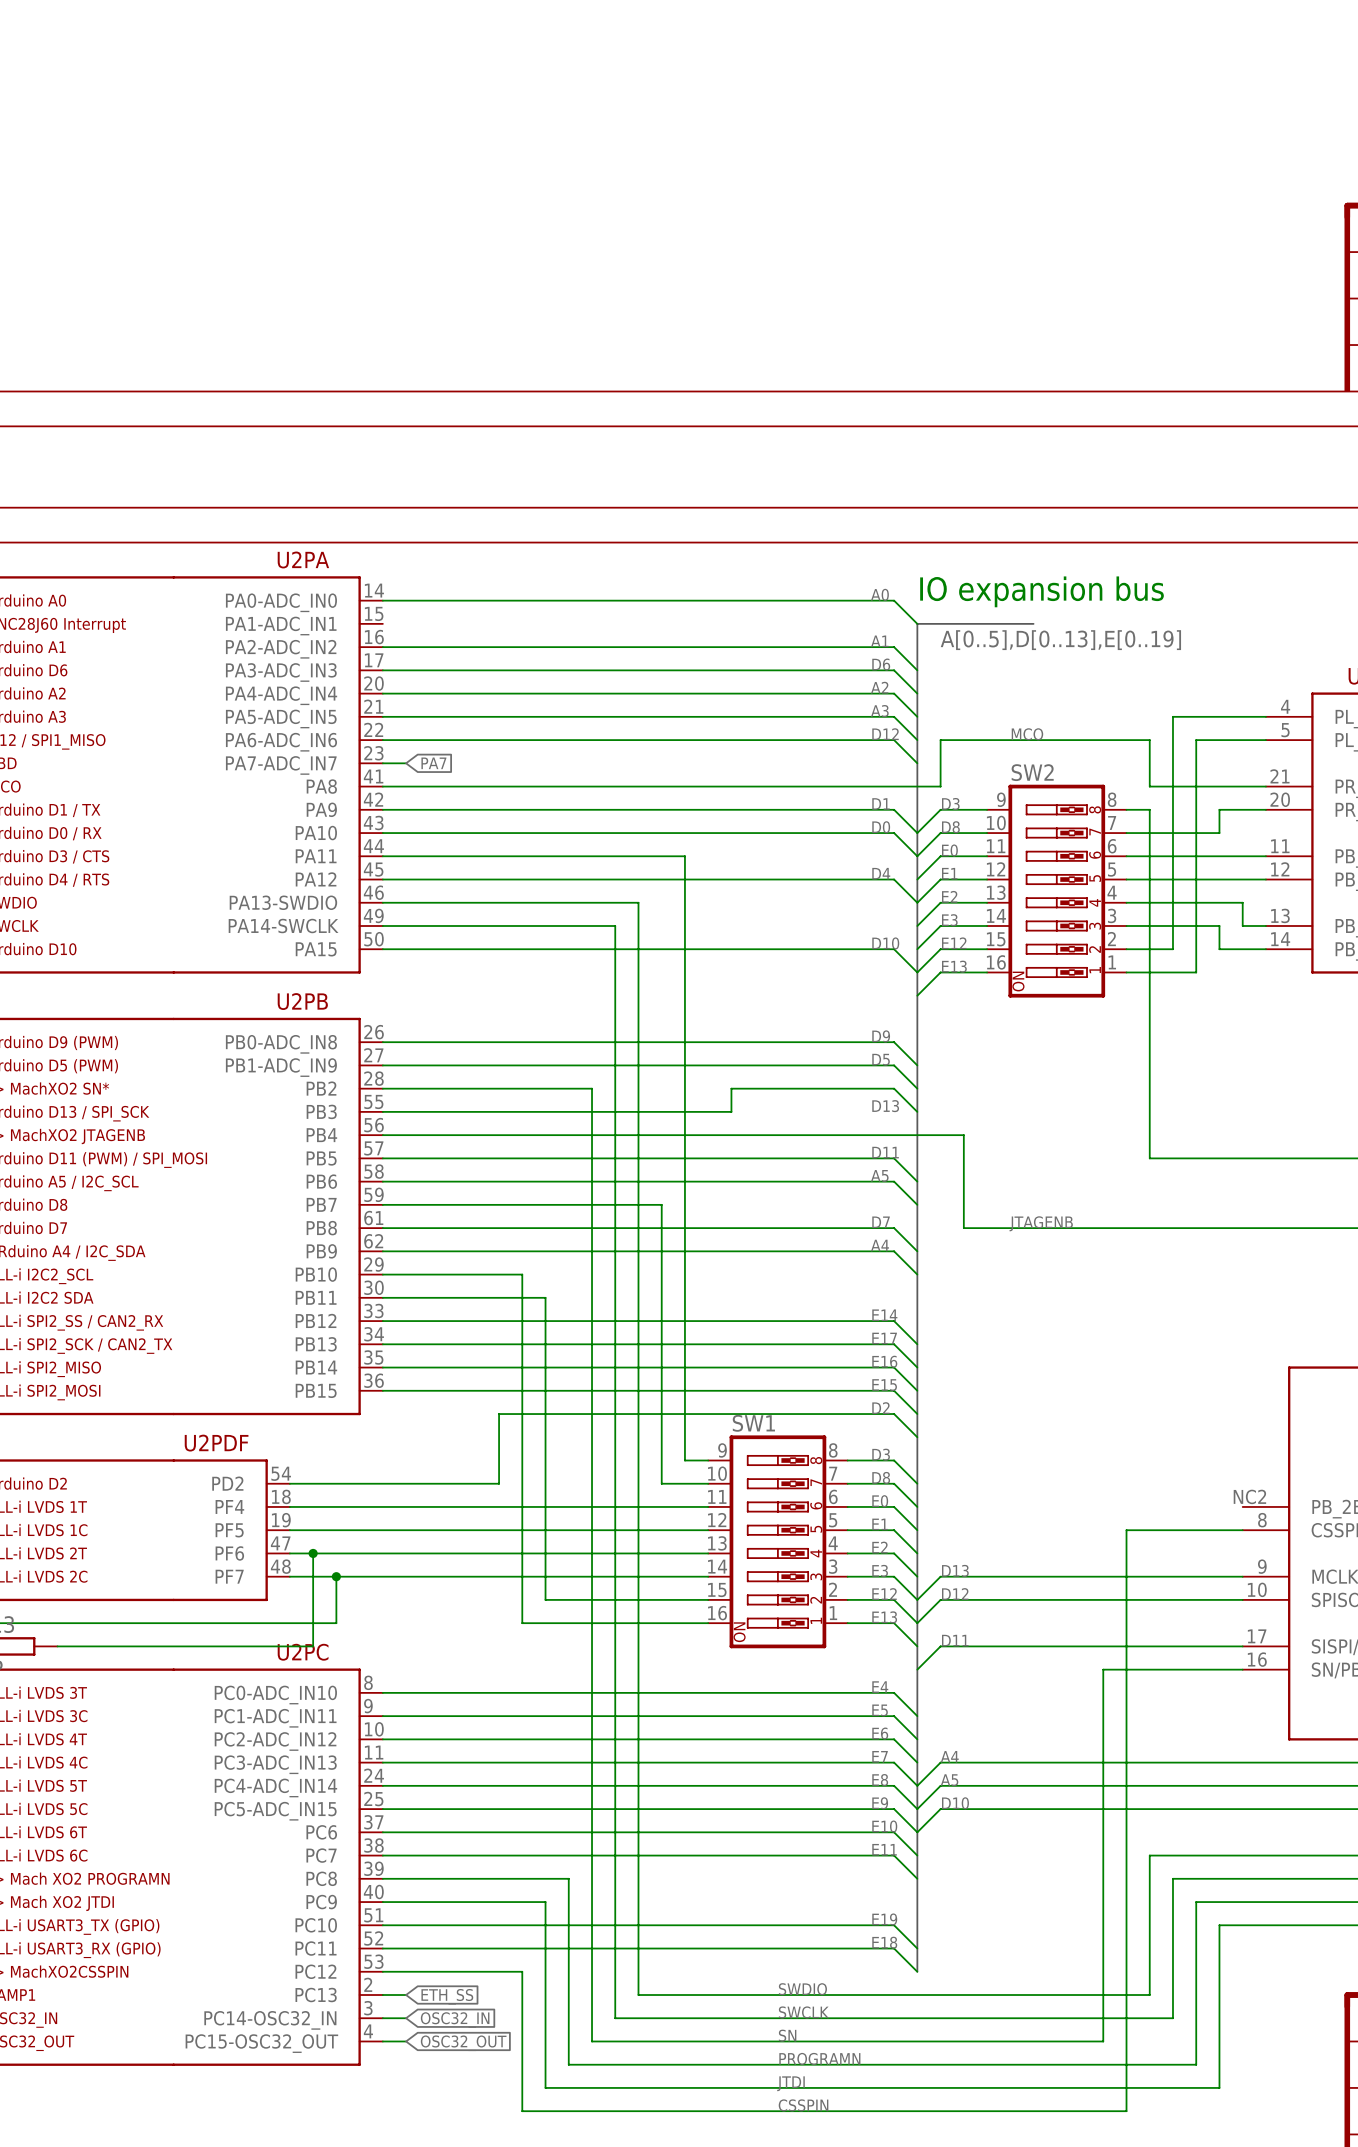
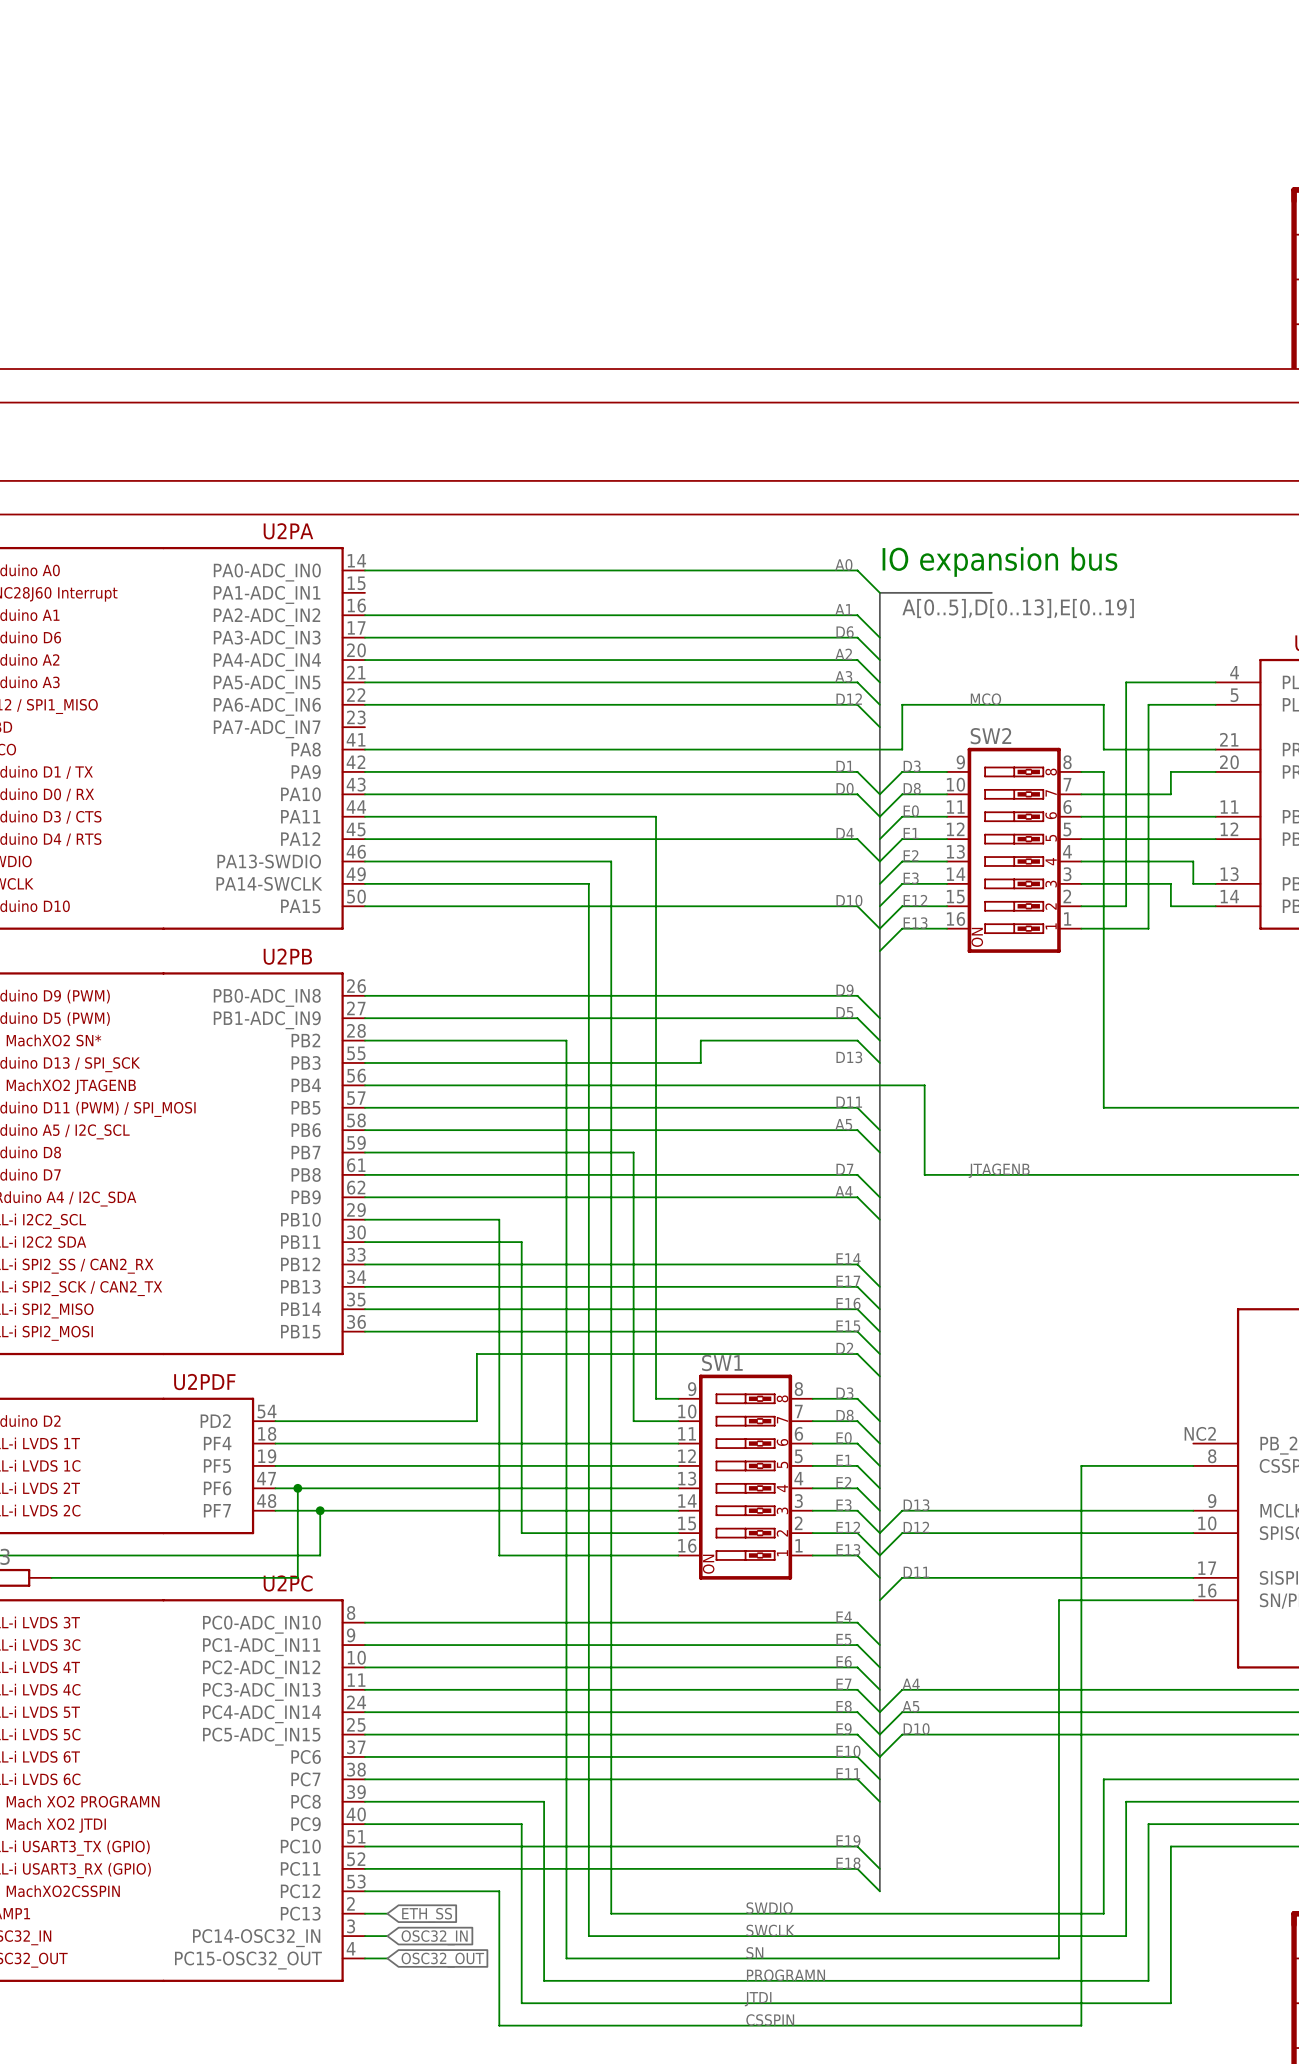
wire: (382, 763) (406, 763) -> none
global label: PA7 (433, 763) -> none

